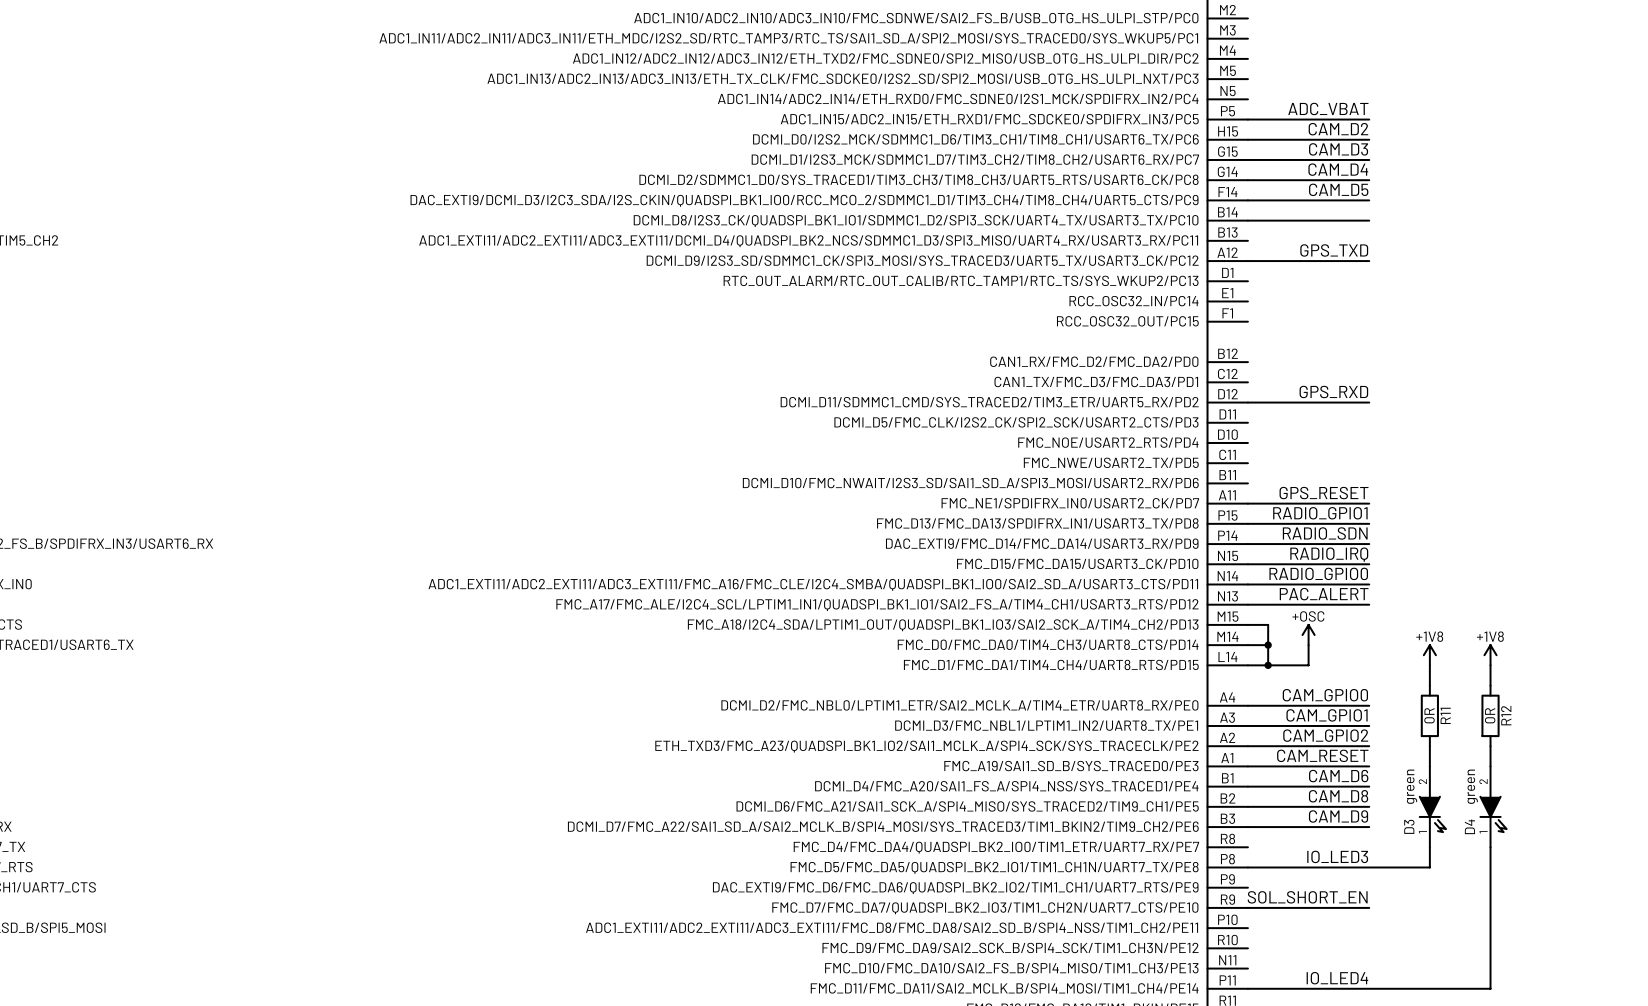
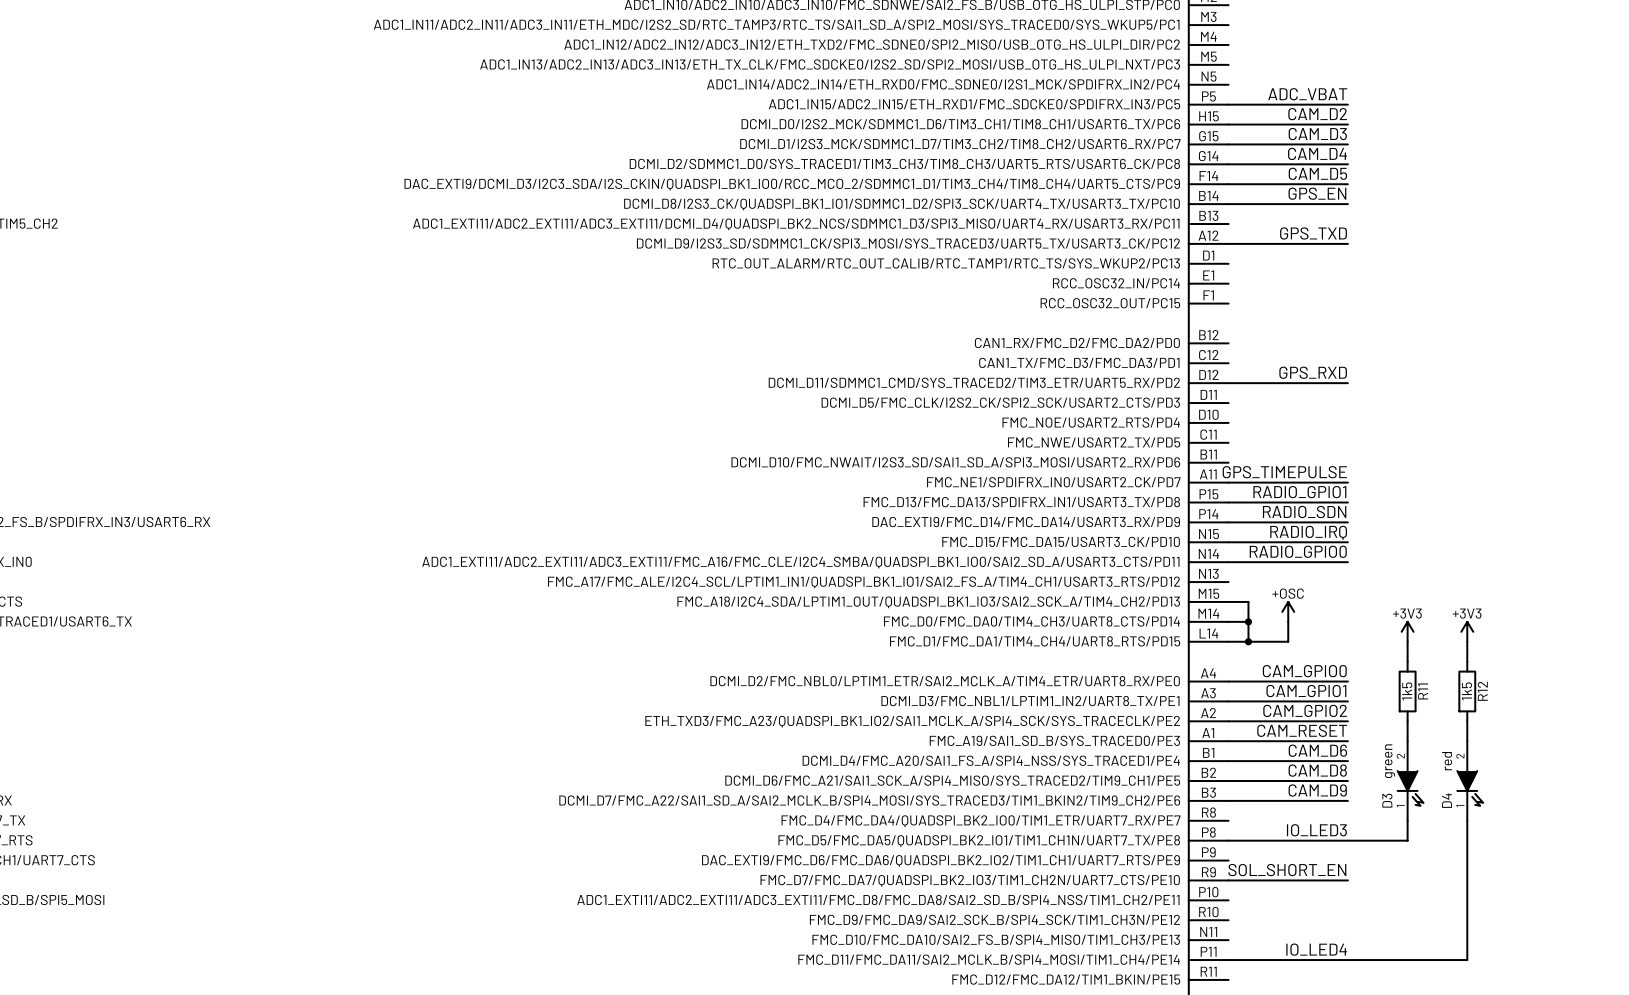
label: none -> GPS_EN (1317, 193)
label: GPS_RESET (1324, 493) -> GPS_TIMEPULSE (1284, 472)
label: PAC_ALERT (1324, 594) -> none
wire: (1247, 604) (1369, 604) -> none
power symbol: +1V8 (1429, 655) -> +3V3 (1407, 631)
power symbol: +1V8 (1490, 655) -> +3V3 (1467, 631)
R11 value: 0R (1429, 715) -> 1k5 (1407, 691)
R12 value: 0R (1490, 715) -> 1k5 (1466, 691)
D4 value: green (1472, 786) -> red (1447, 761)

